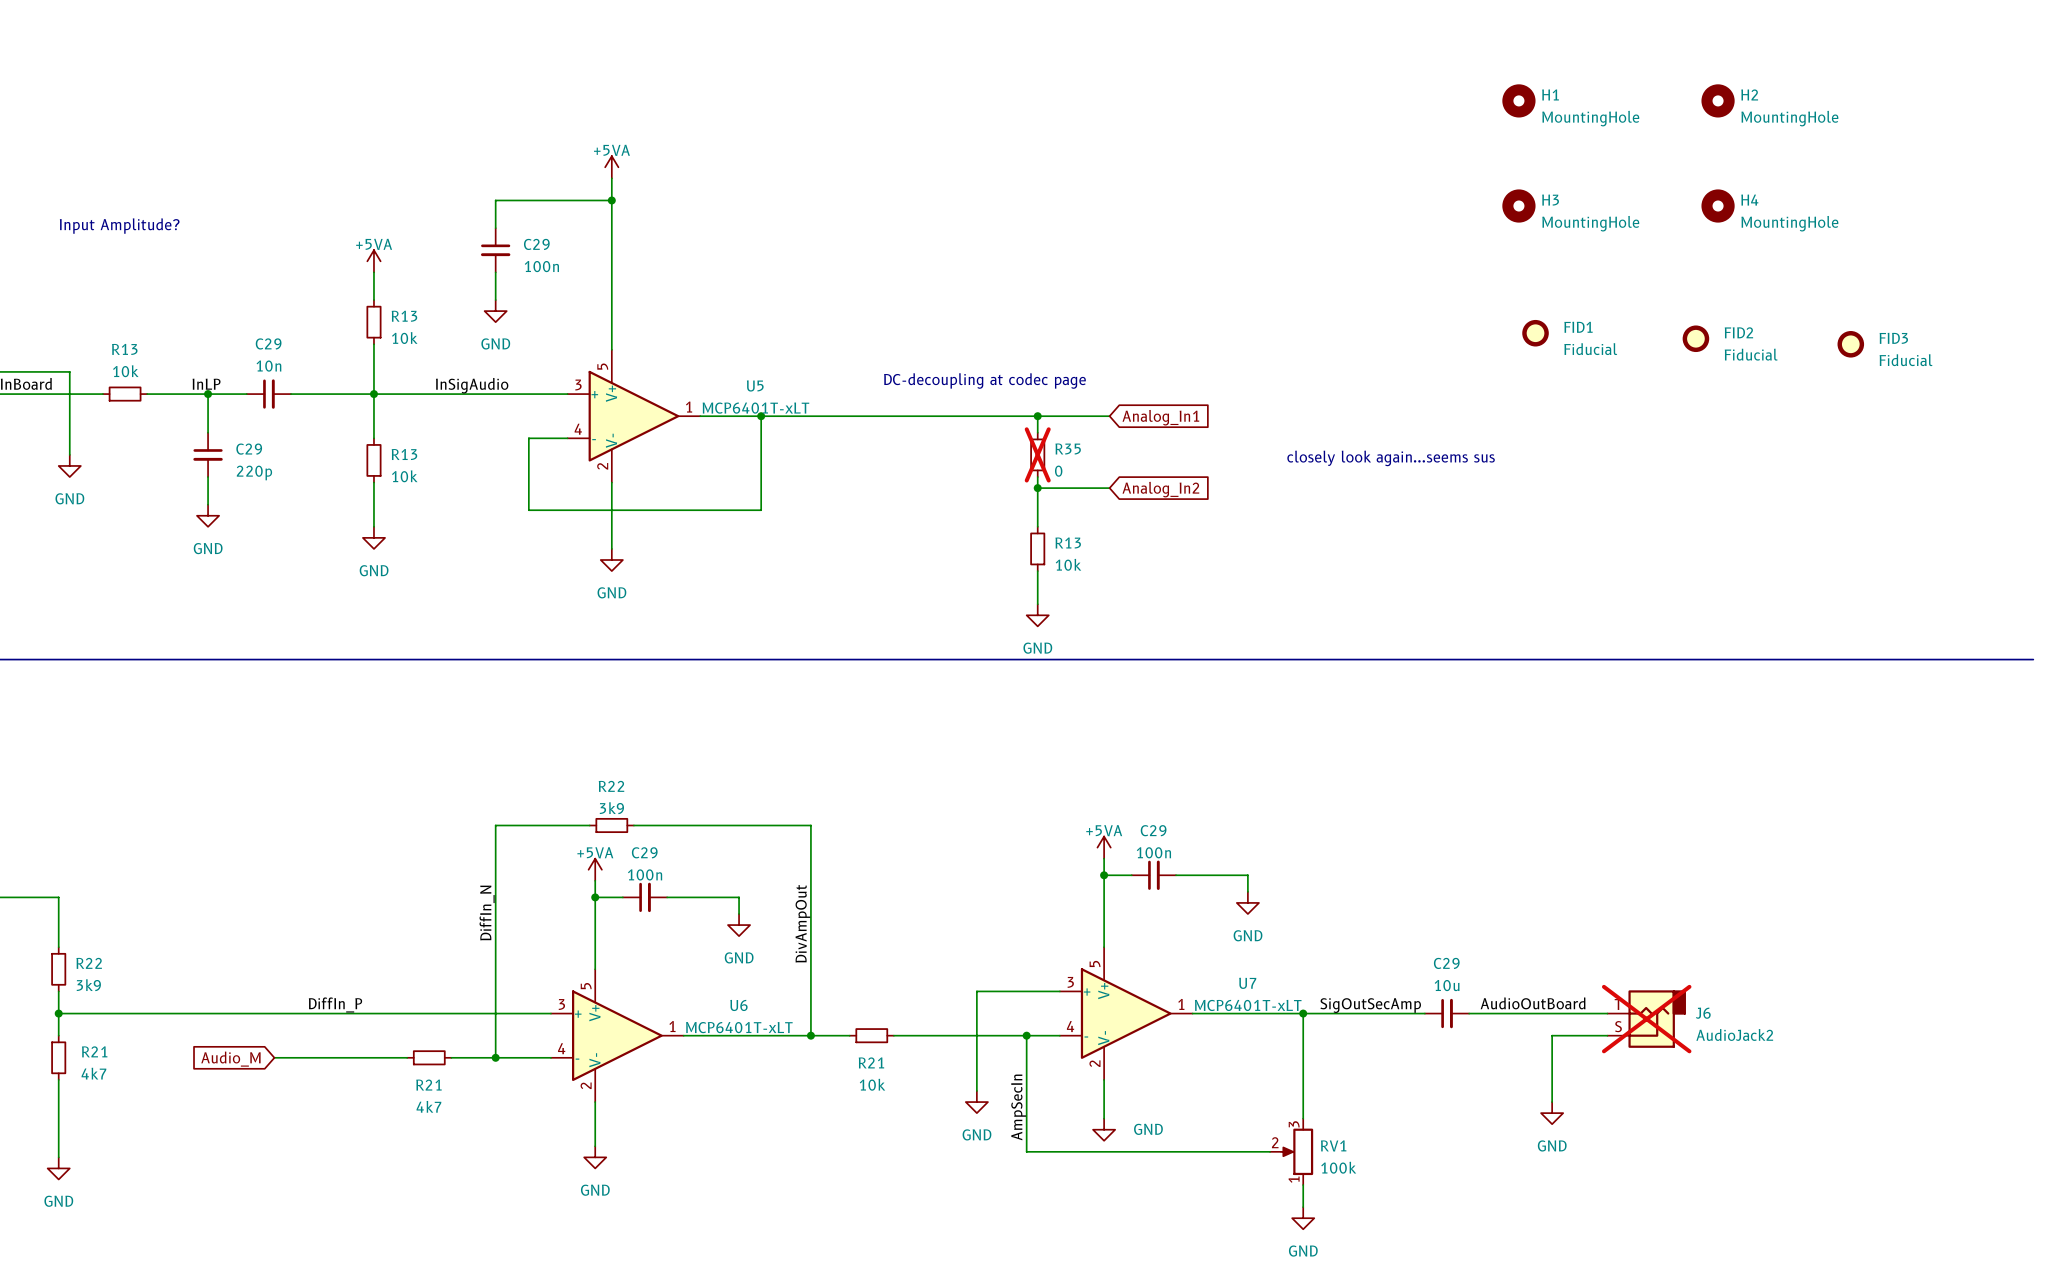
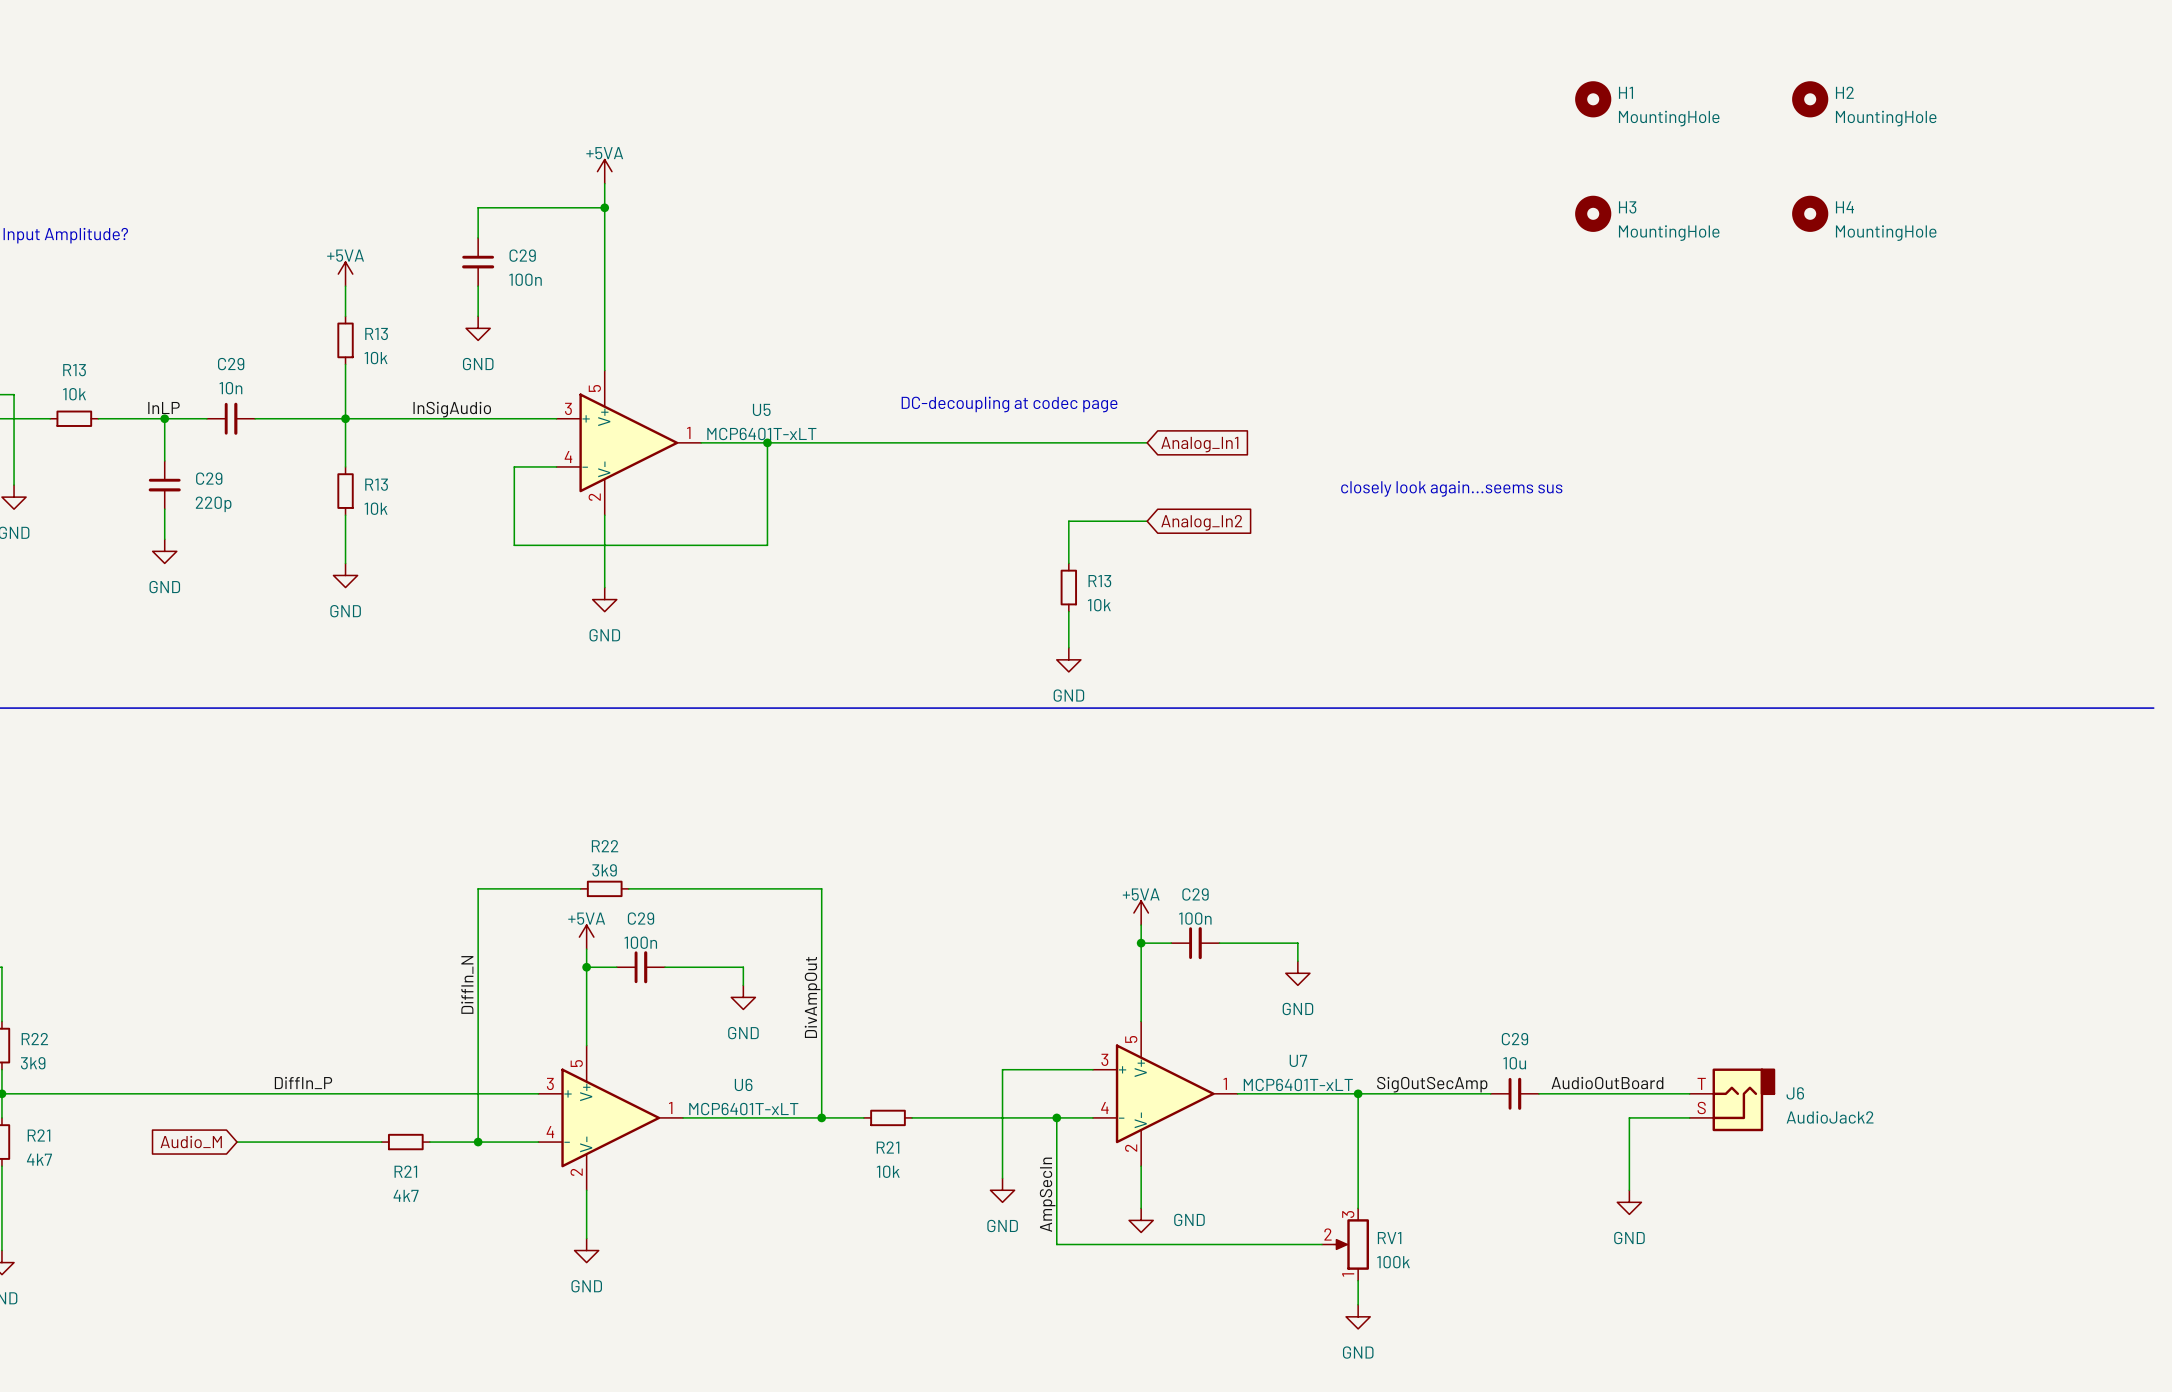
FID1: Fiducial (1535, 333) -> none
FID2: Fiducial (1695, 338) -> none
FID3: Fiducial (1850, 344) -> none
wire: (1037, 416) (1037, 432) -> none
junction: (1037, 416) -> none
R35: 0 (1037, 454) -> none
wire: (1037, 477) (1037, 488) -> none
junction: (1037, 488) -> none
J6 do-not-place cross: (1646, 1019) -> none

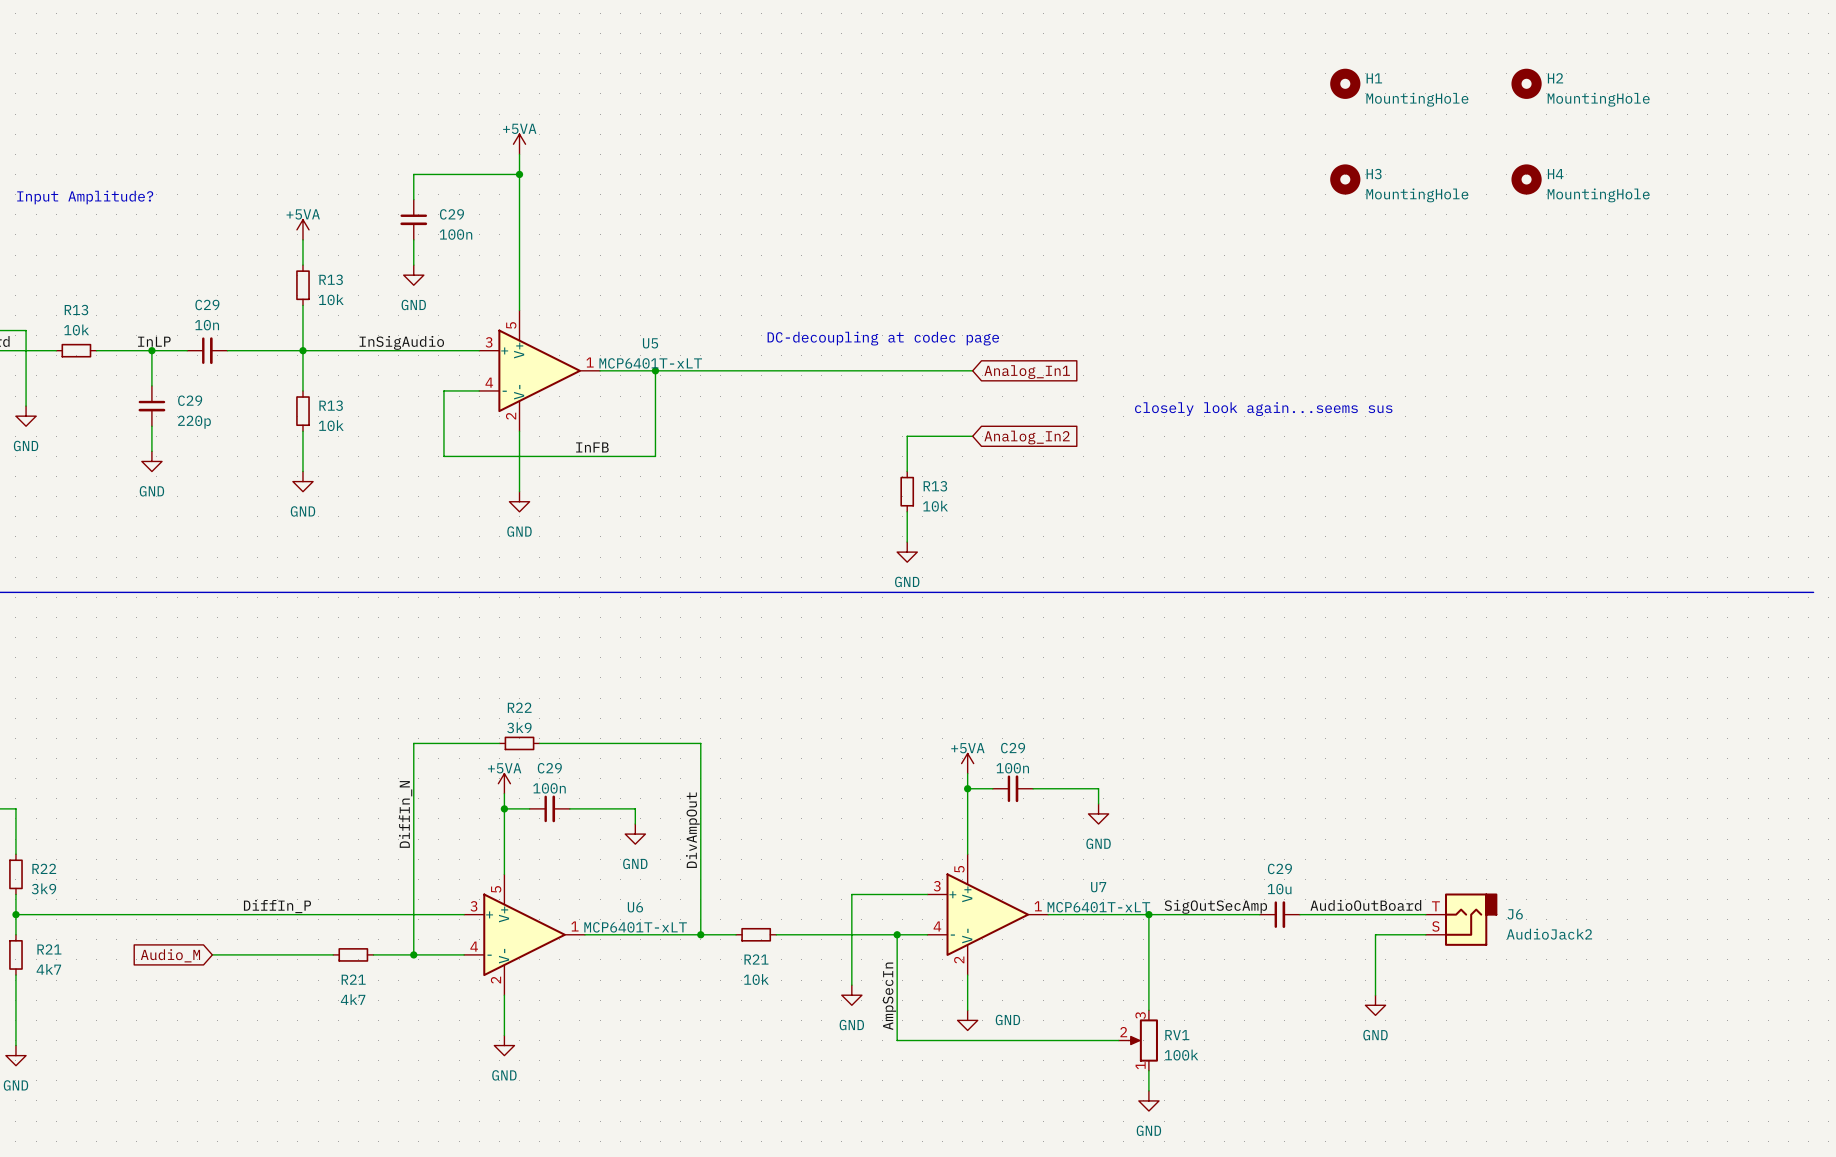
label: none -> InFB (592, 447)

